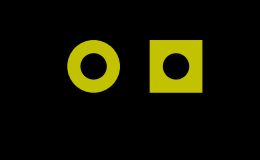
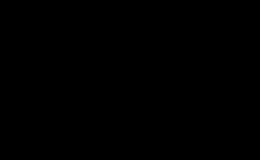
part: (134, 66) -> none

